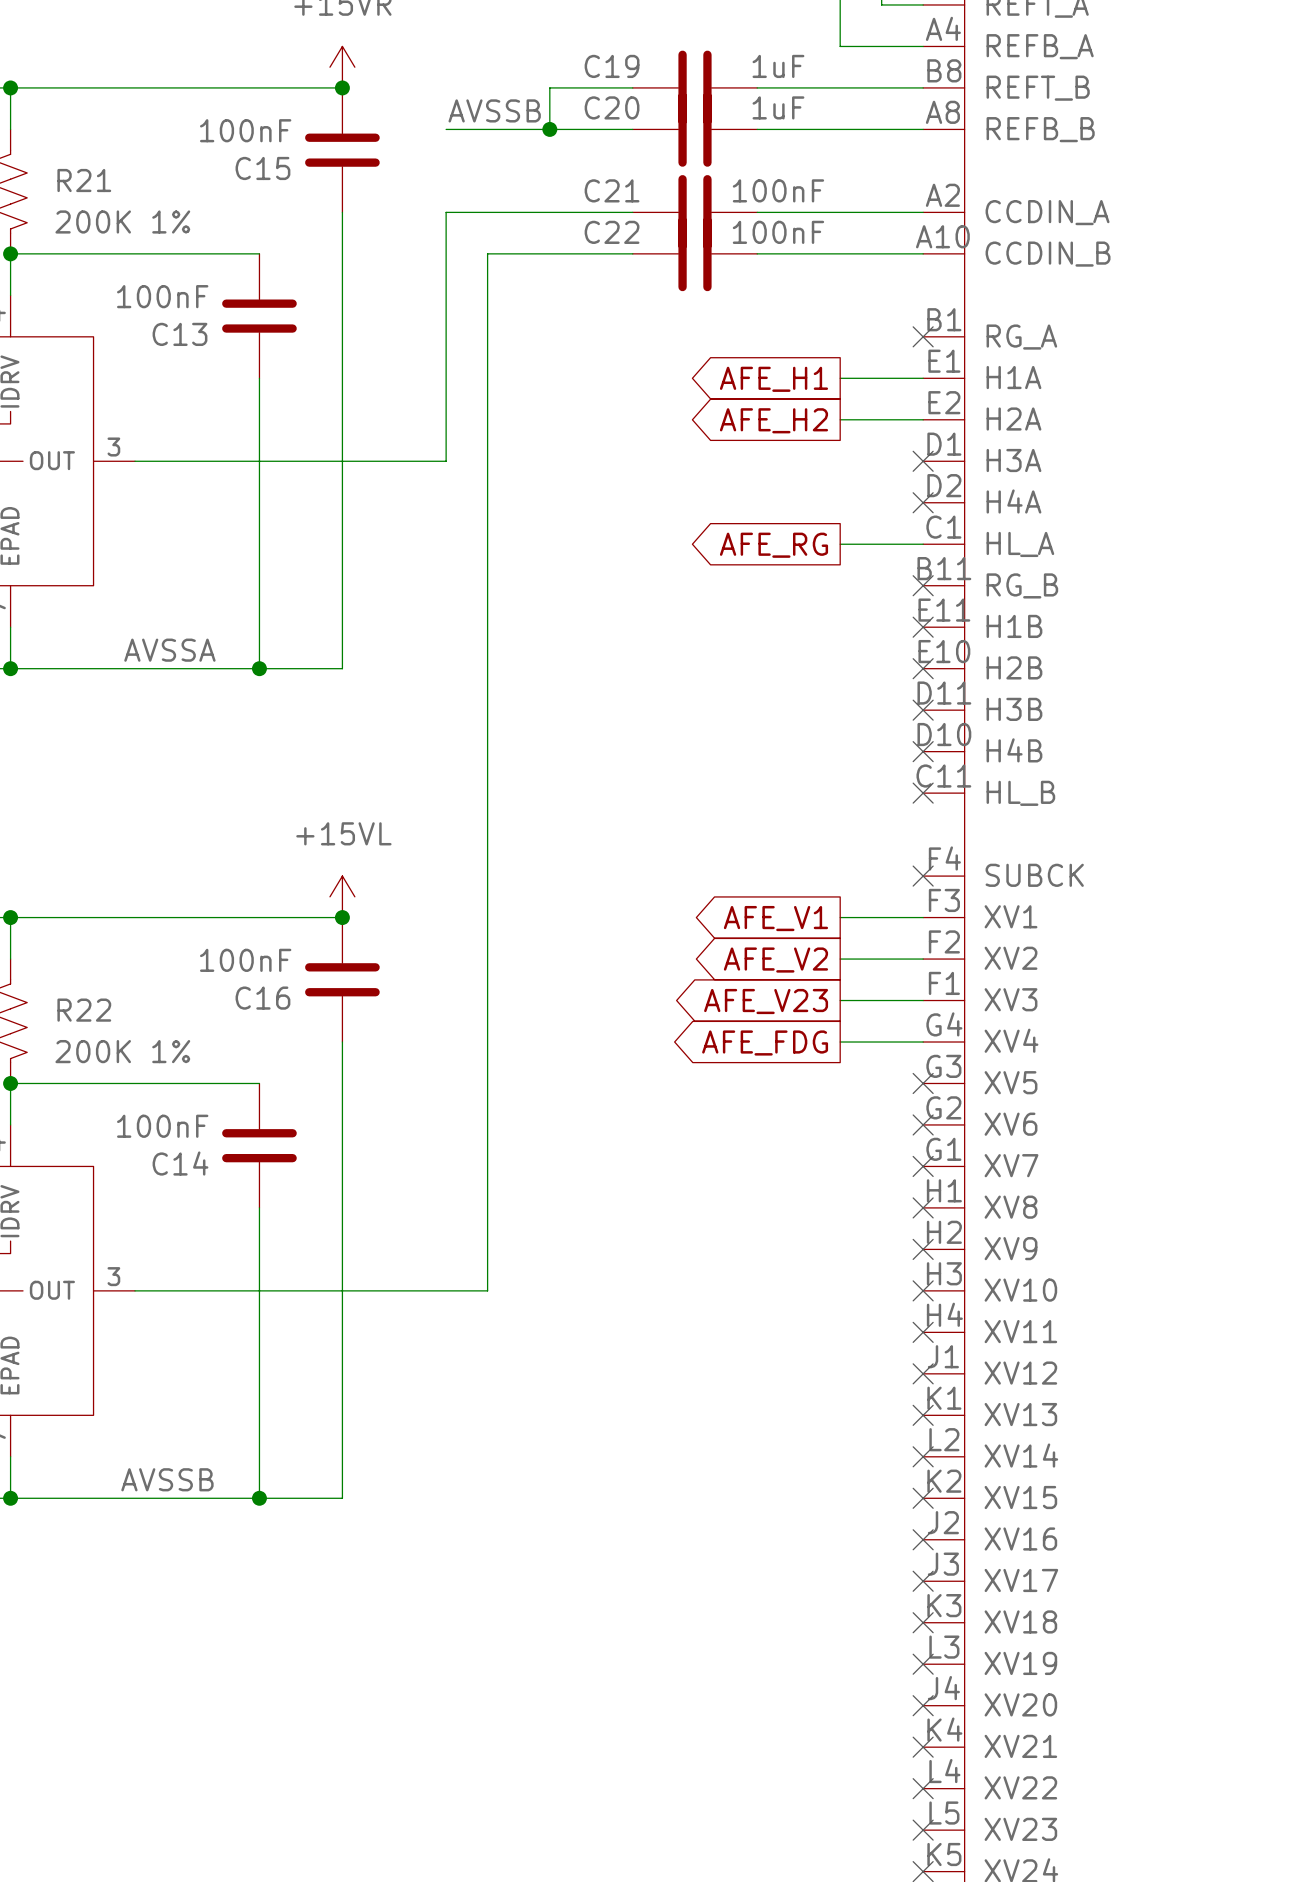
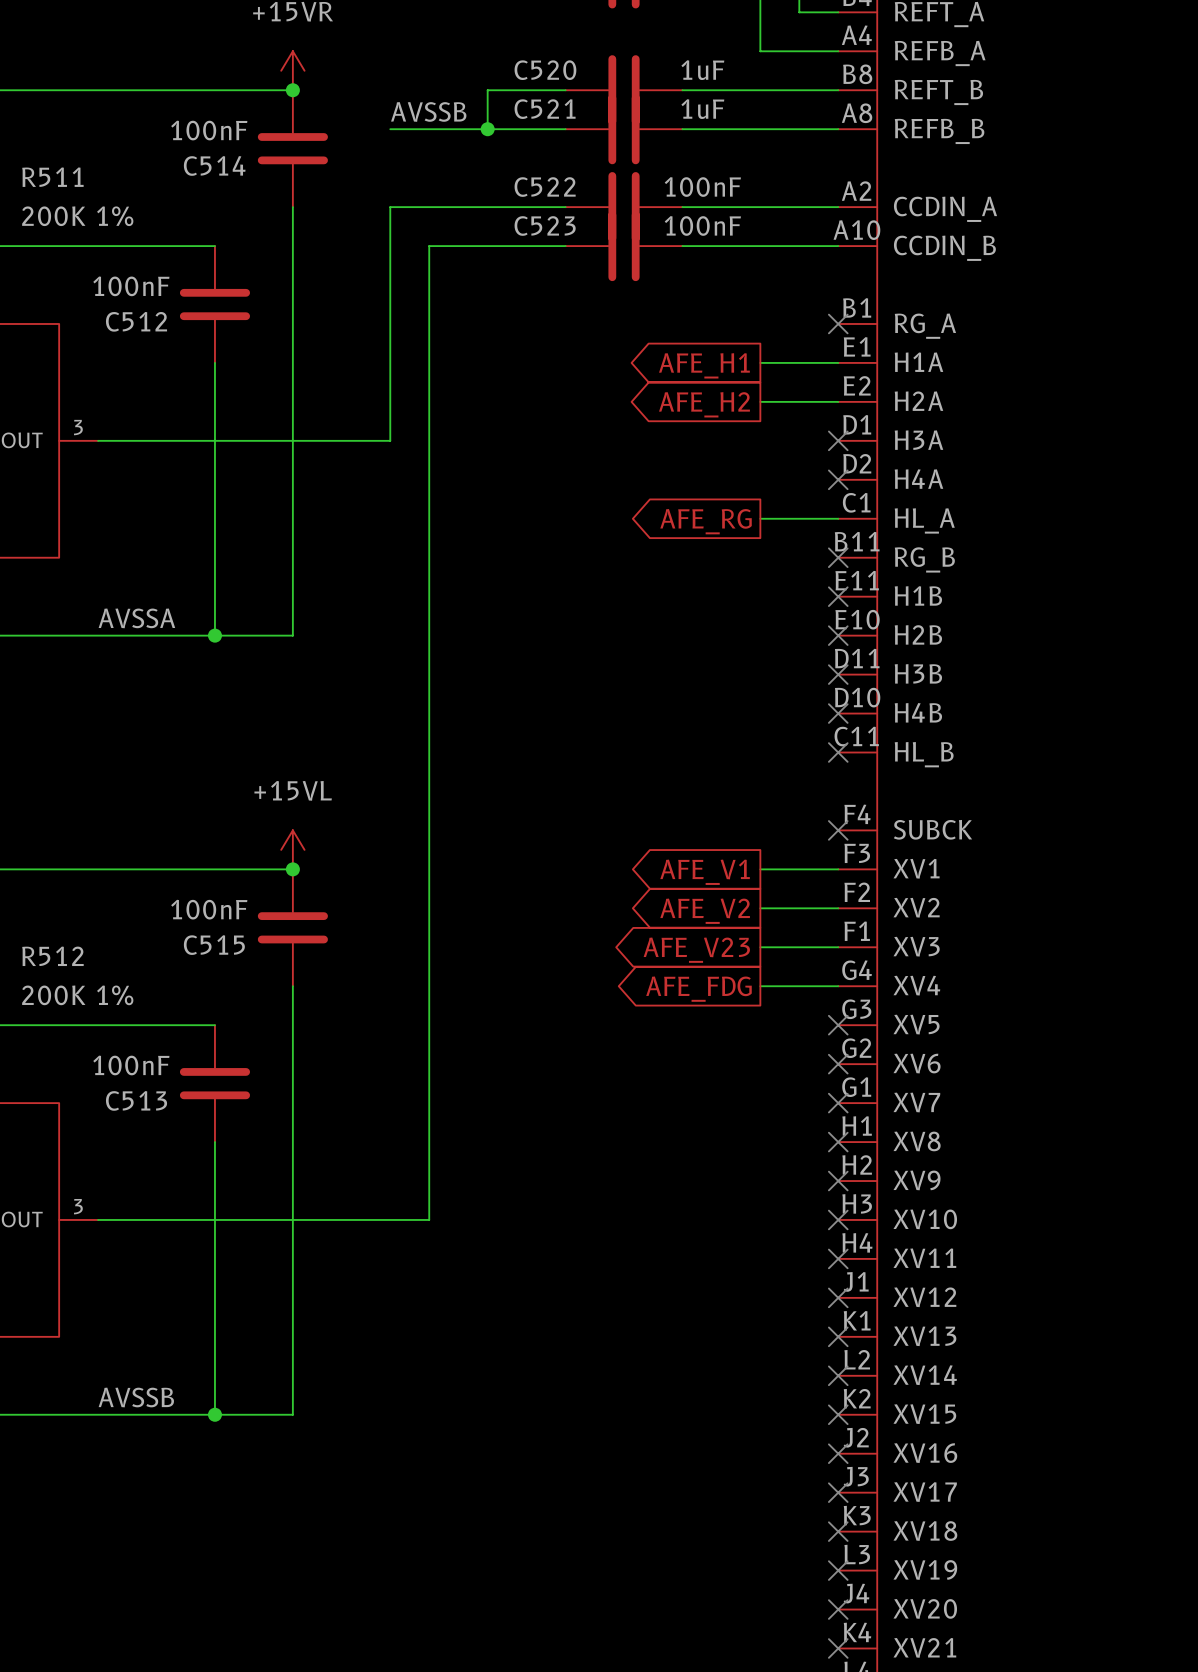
C19 name: C19 (612, 66) -> C520 (545, 70)
C20 name: C20 (612, 107) -> C521 (545, 109)
C15 name: C15 (262, 168) -> C514 (214, 165)
R21 name: R21 (84, 180) -> R511 (52, 177)
C21 name: C21 (612, 190) -> C522 (545, 187)
C22 name: C22 (612, 232) -> C523 (545, 226)
C13 name: C13 (179, 334) -> C512 (136, 321)
C16 name: C16 (262, 998) -> C515 (214, 945)
R22 name: R22 (84, 1010) -> R512 (52, 956)
C14 name: C14 (180, 1163) -> C513 (136, 1100)

